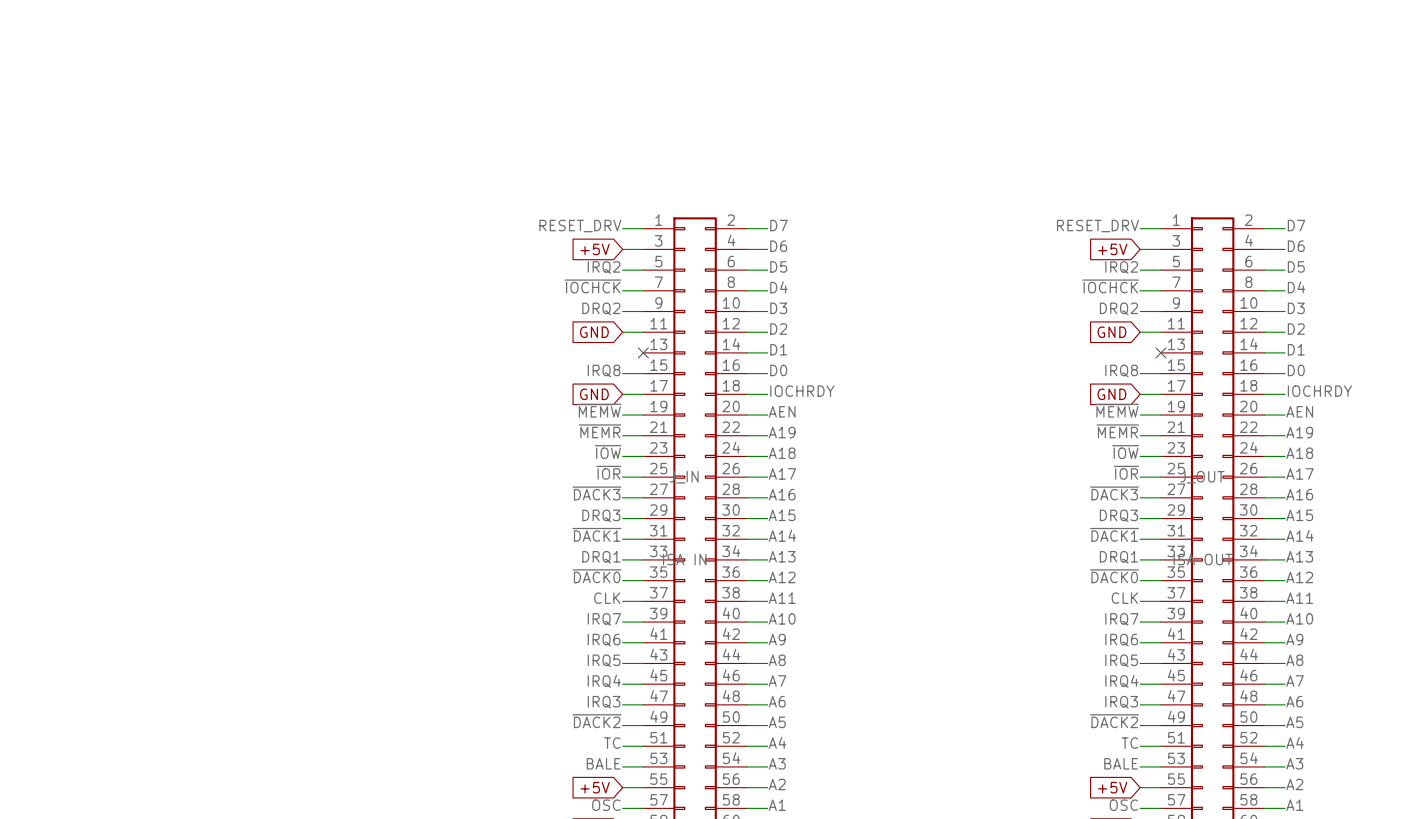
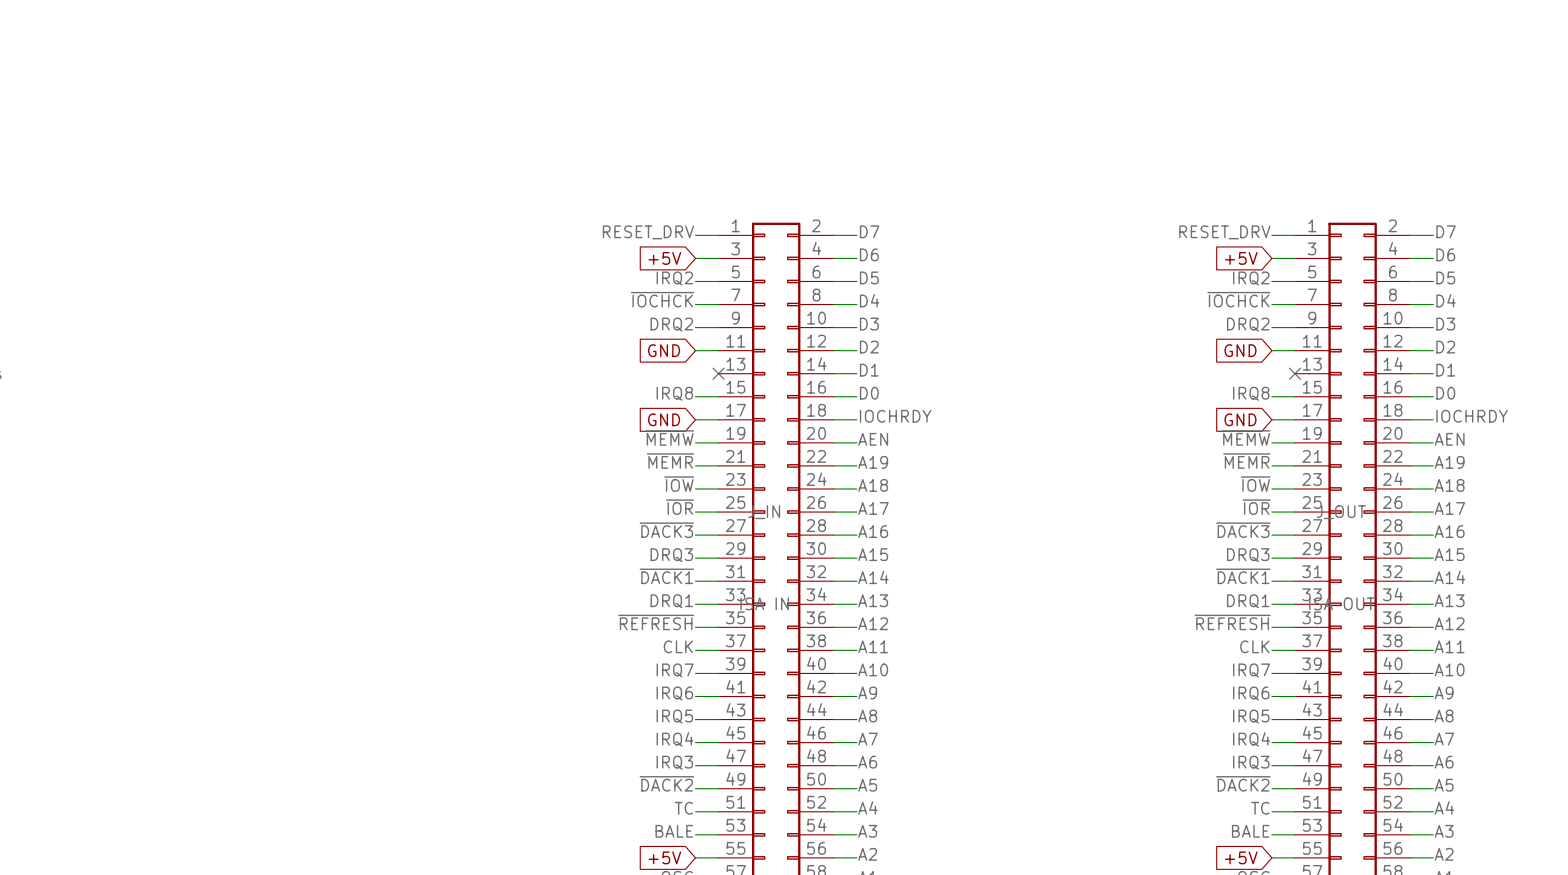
label: ~{DACK0} (596, 576) -> ~{REFRESH} (656, 622)
label: ~{DACK0} (1114, 576) -> ~{REFRESH} (1232, 622)

